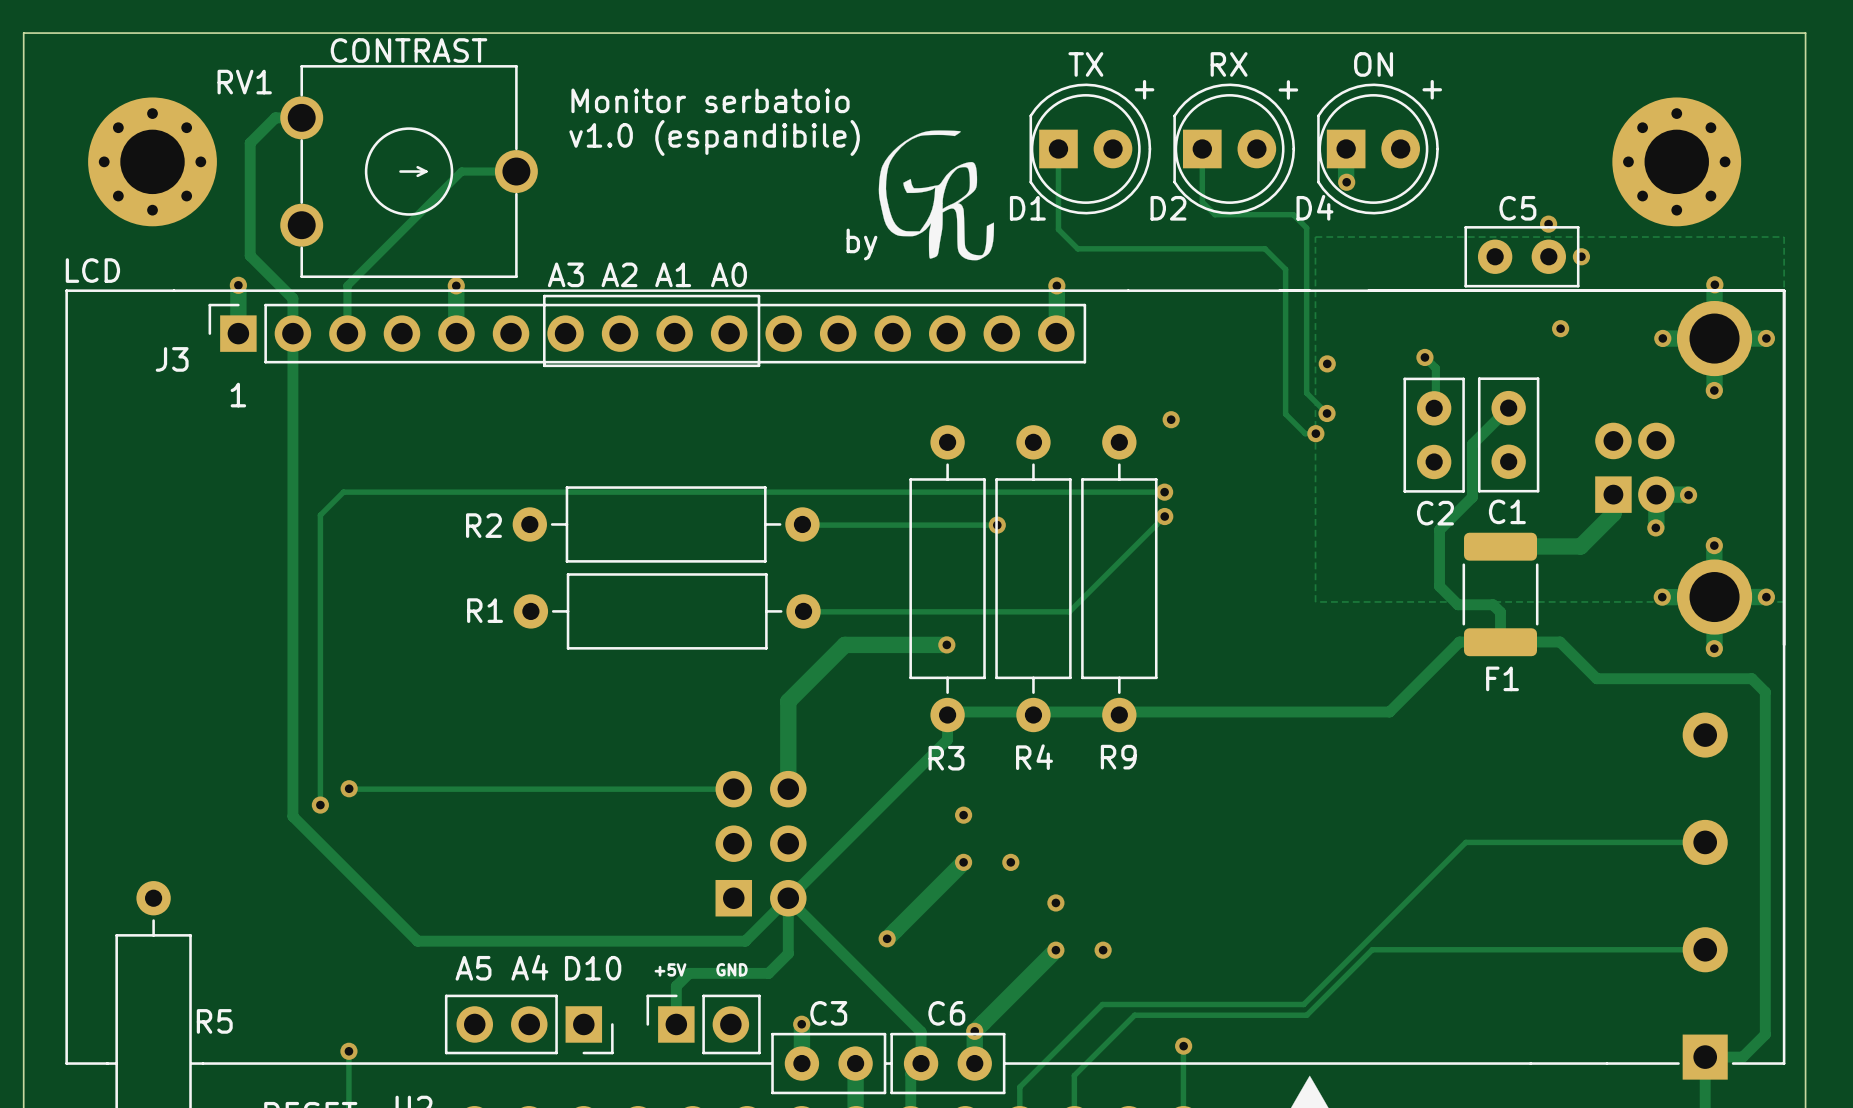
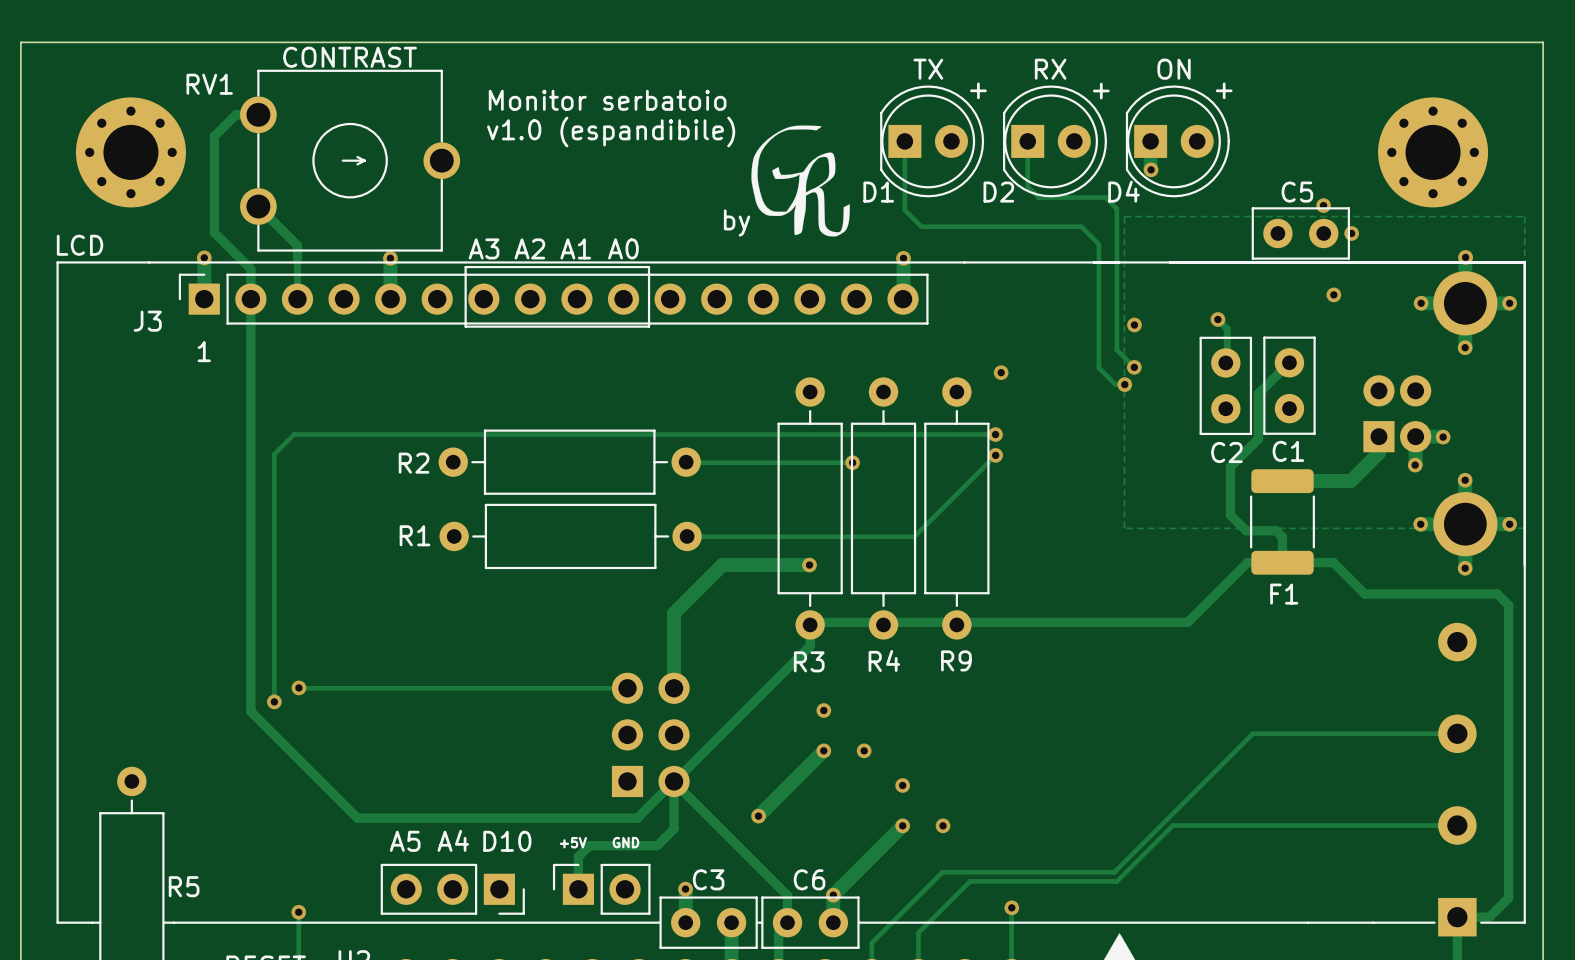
track: (516, 171) (461, 171) (347, 285) -> (258, 206) (297, 245) (297, 258)

